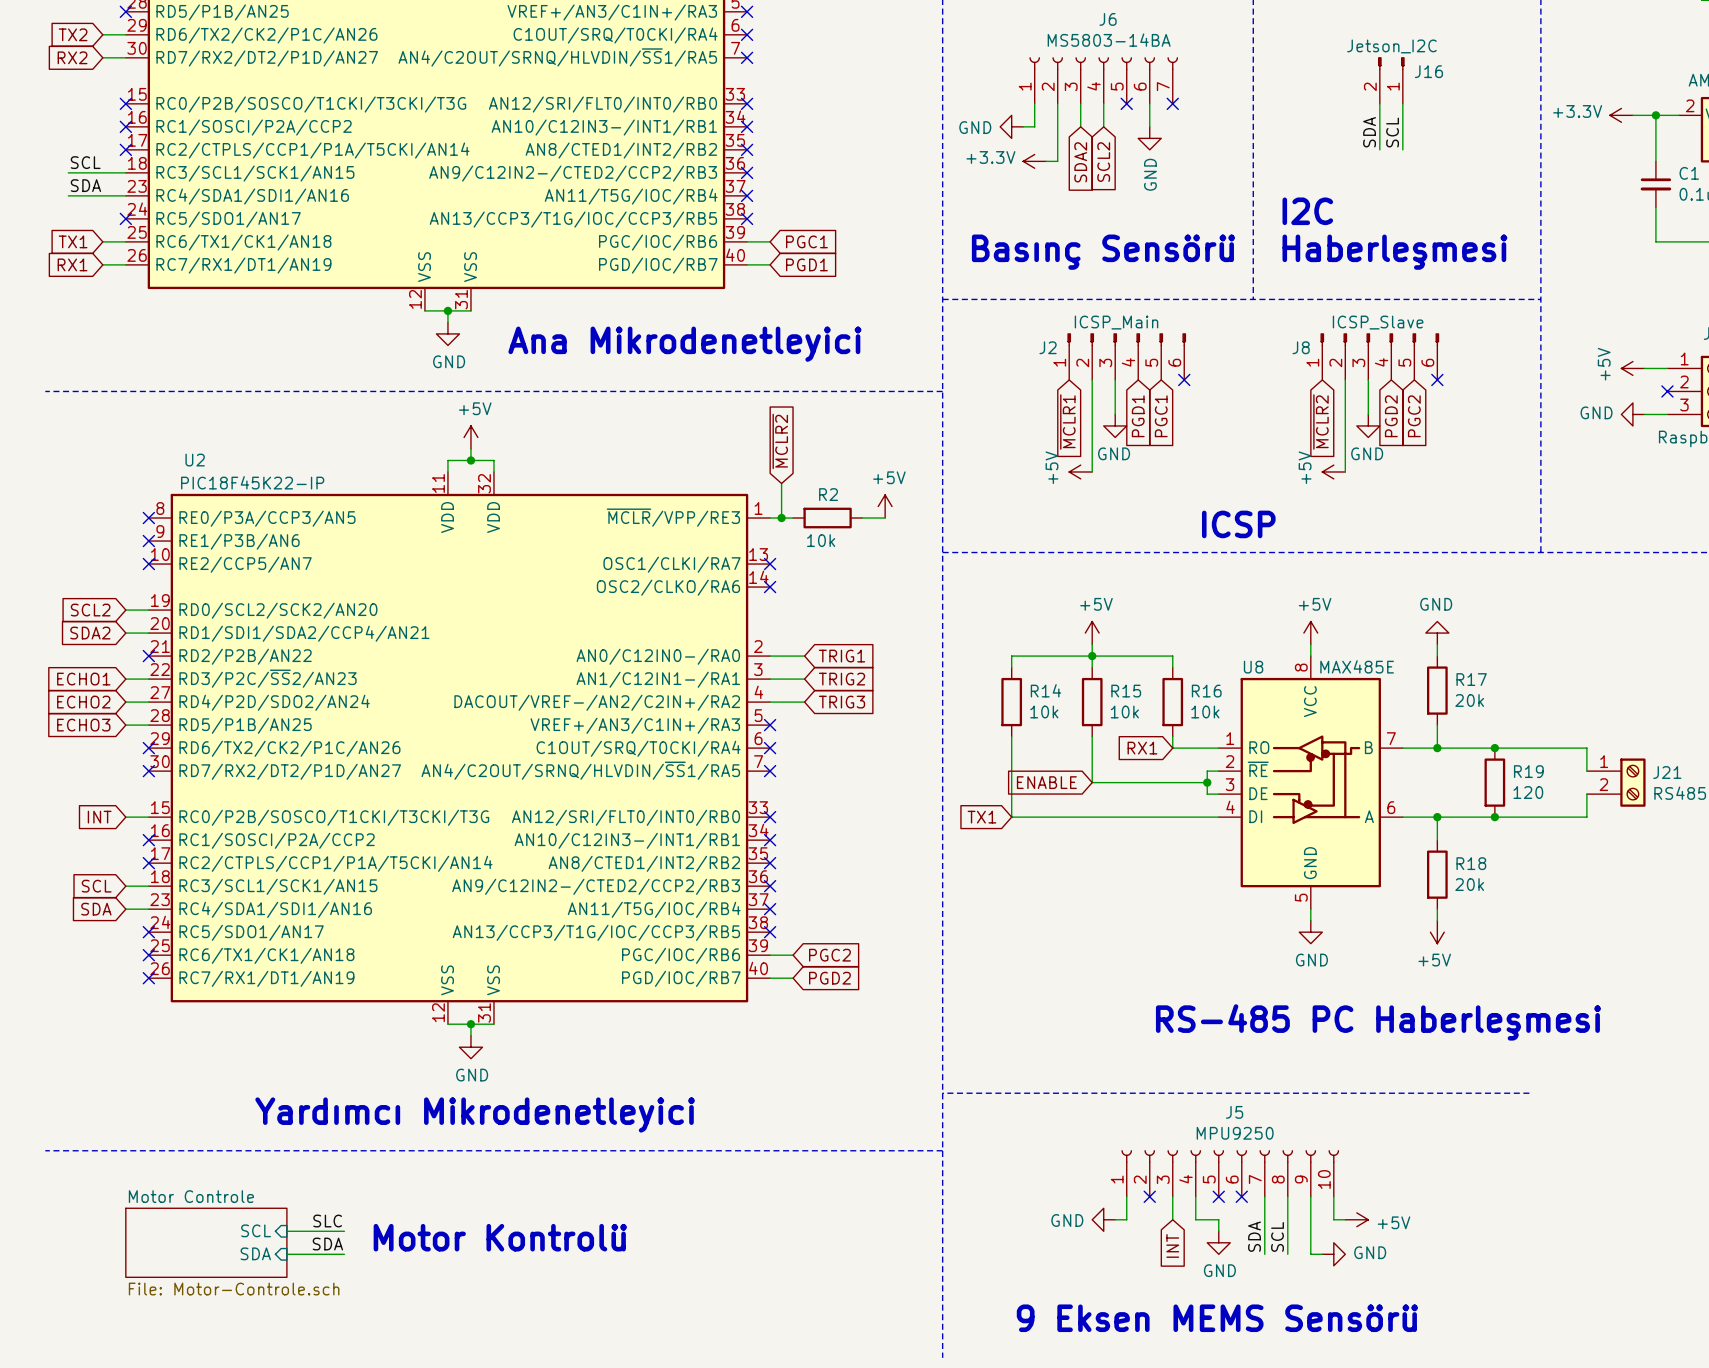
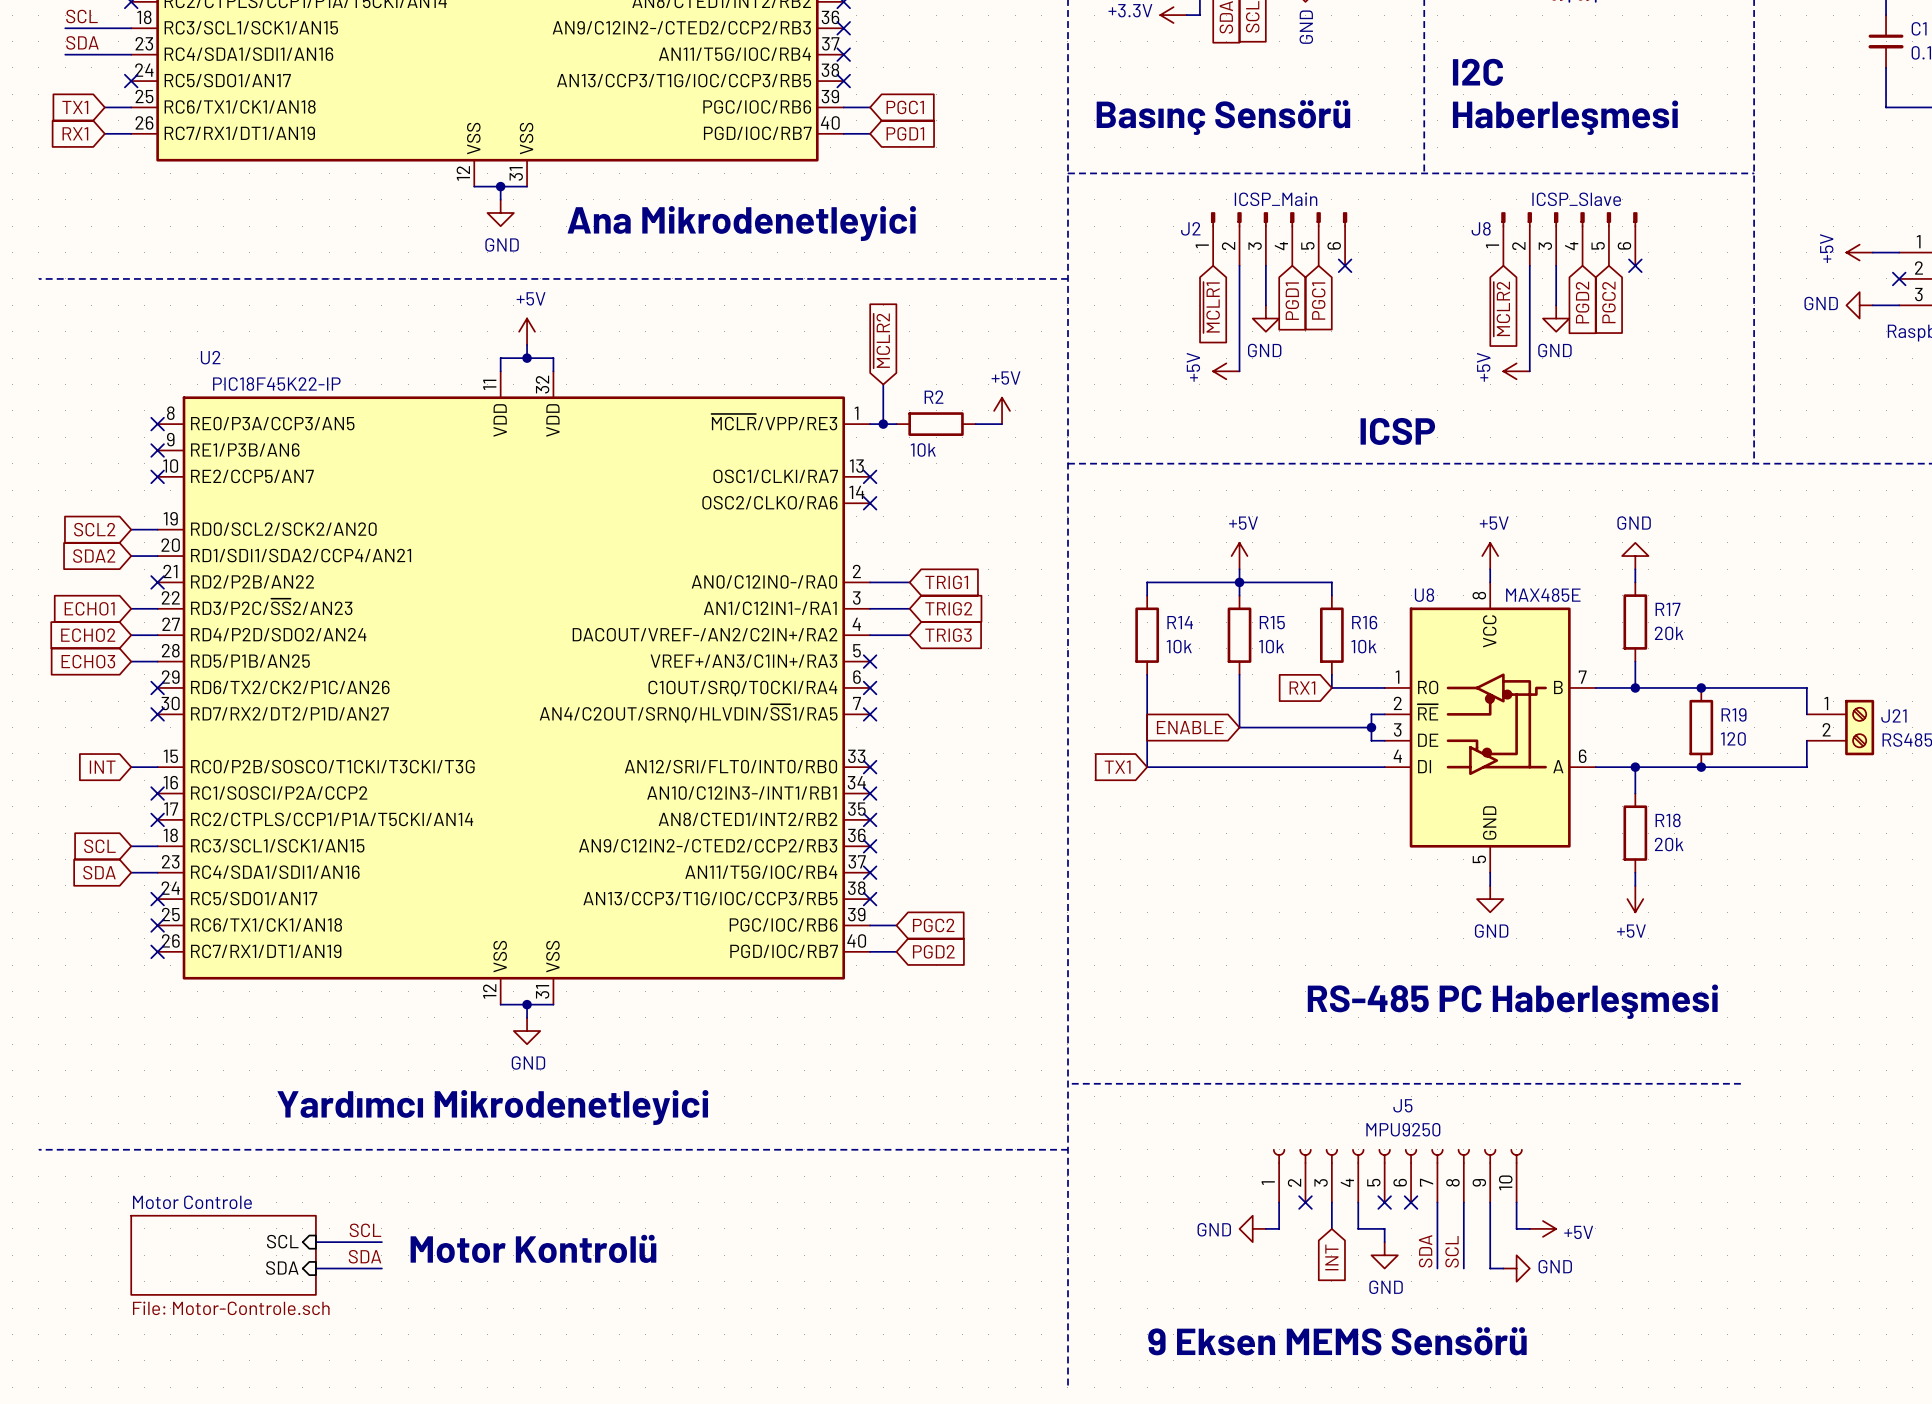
label: SLC (327, 1221) -> SCL (365, 1230)

